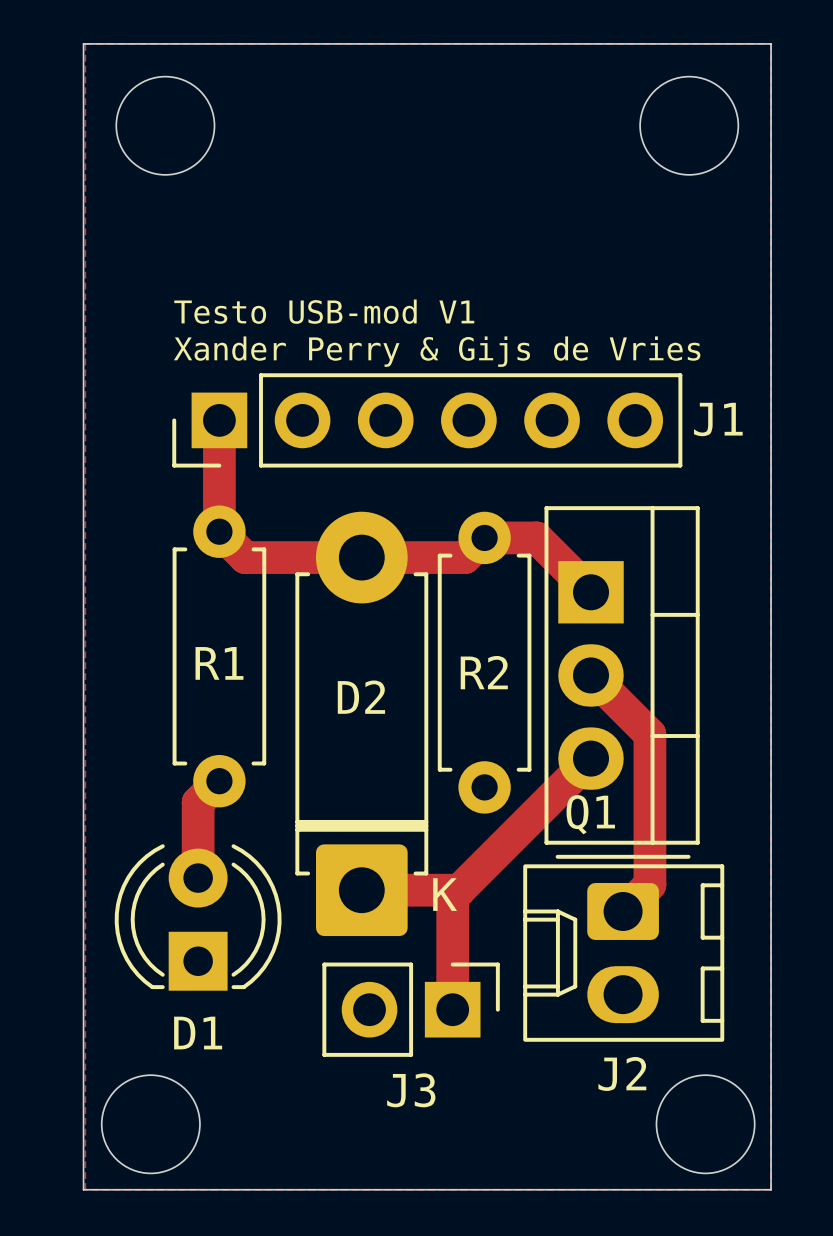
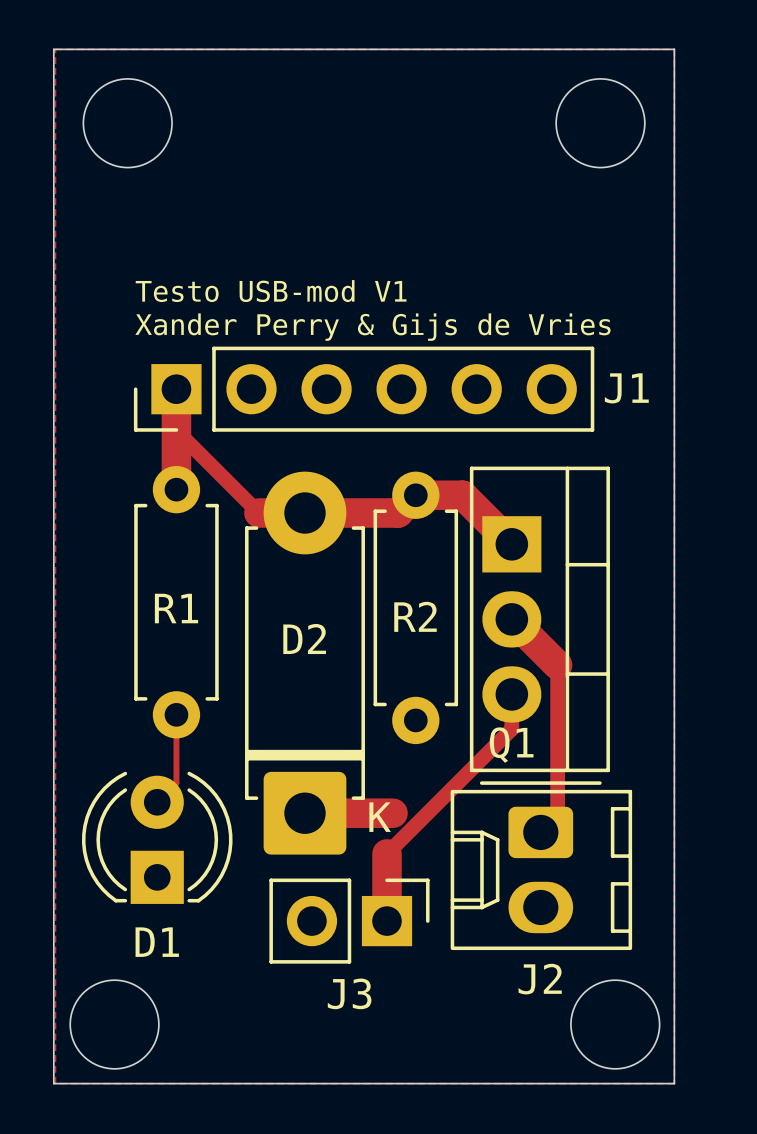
top track: (219, 531) (245, 557) (310, 557) -> (176, 430) (258, 513)
top track: (641, 726) (649, 734) (649, 884) (623, 911) -> (557, 665) (557, 815)
top track: (591, 758) (452, 896) (452, 935) -> (511, 694) (511, 729) (387, 853)
top track: (219, 781) (198, 802) (198, 878) -> (176, 714) (176, 783) (157, 802)

